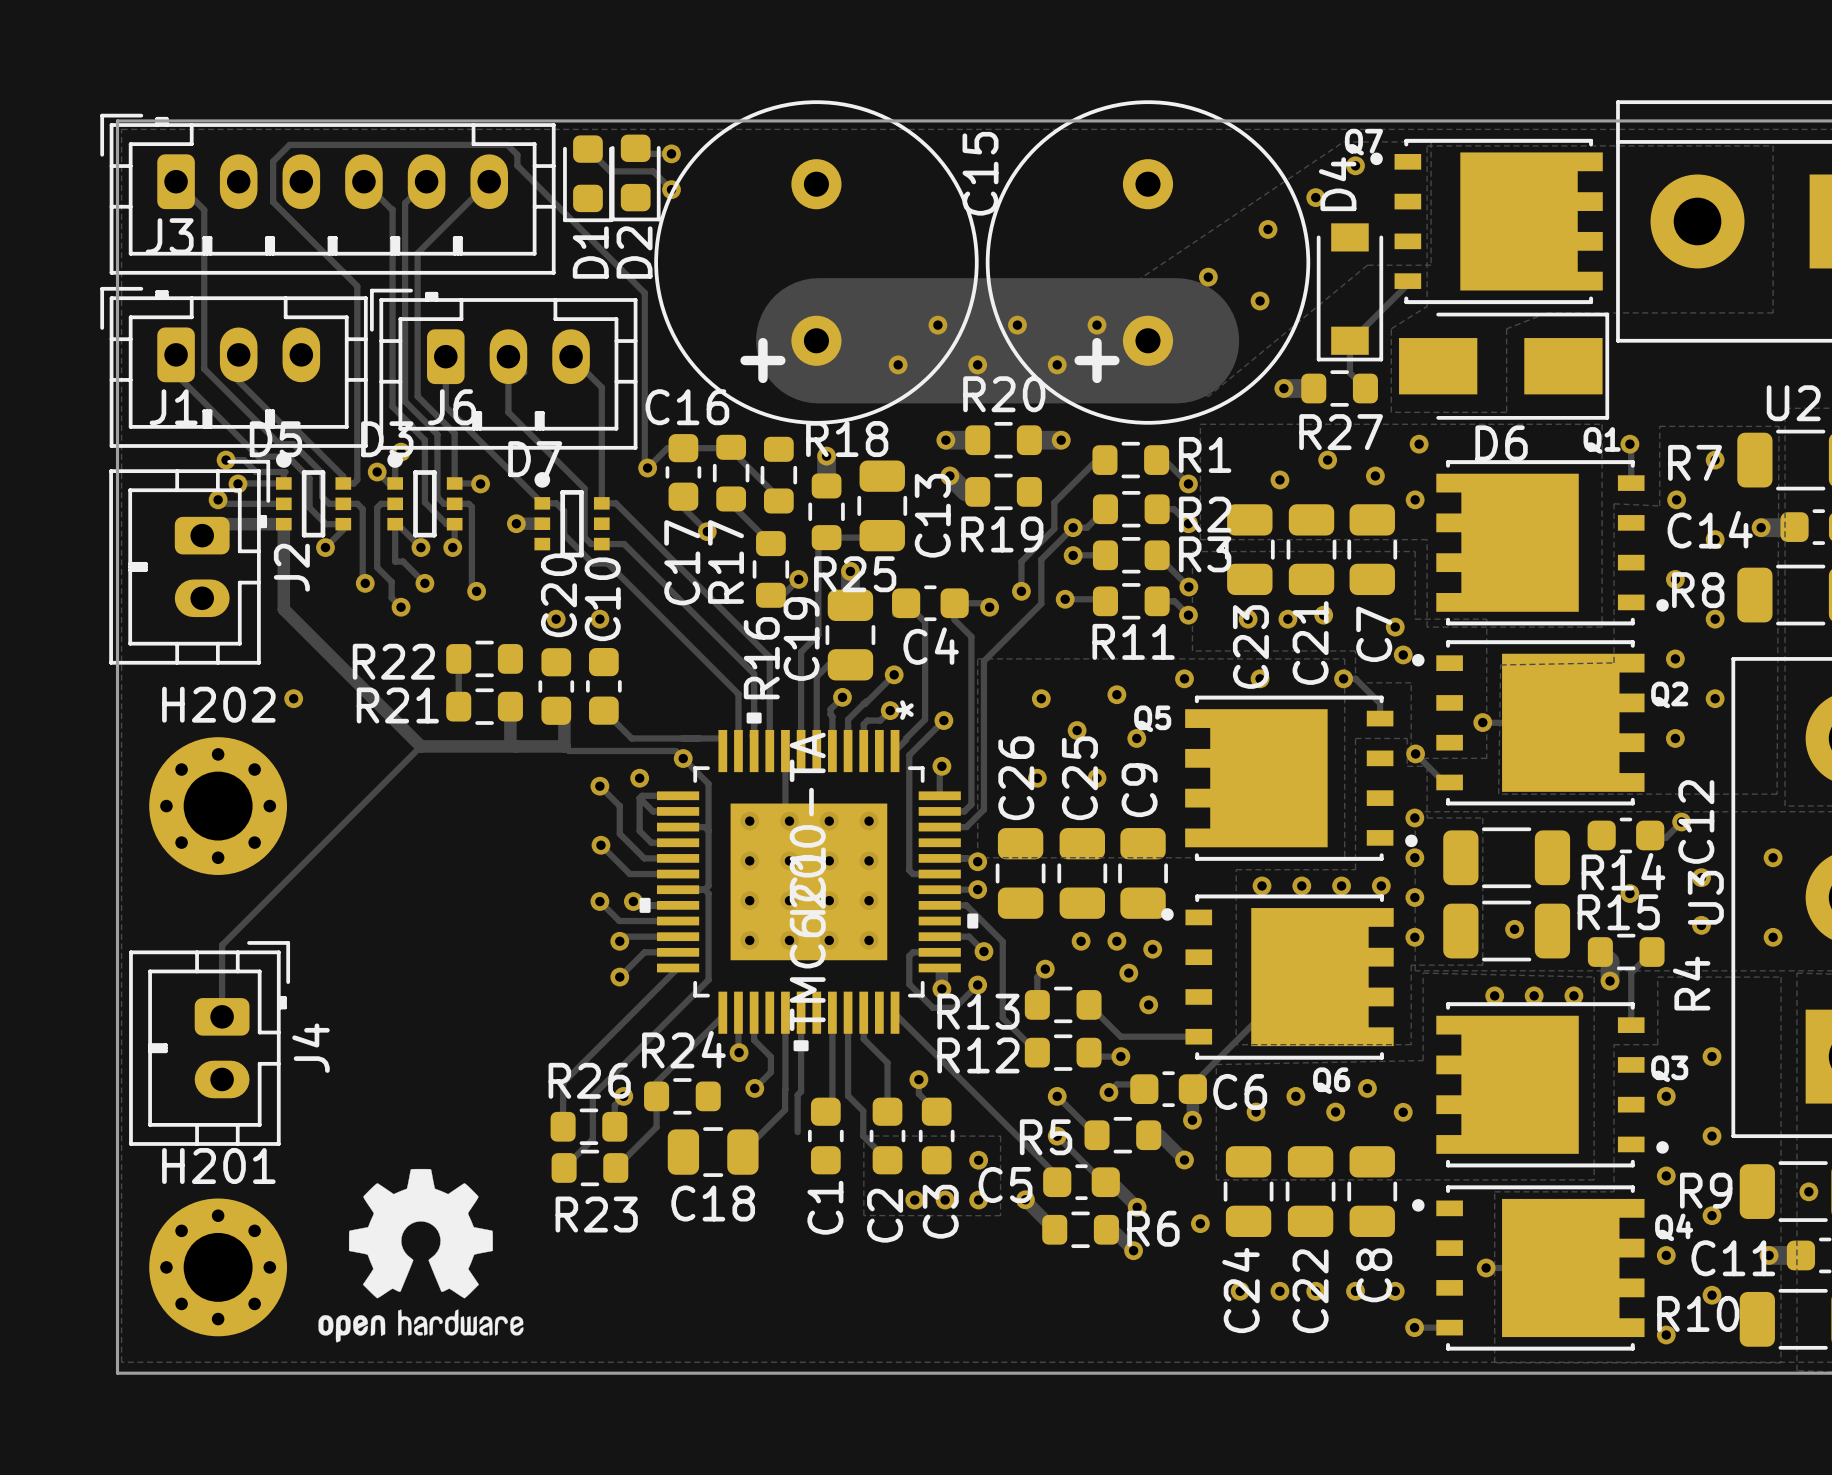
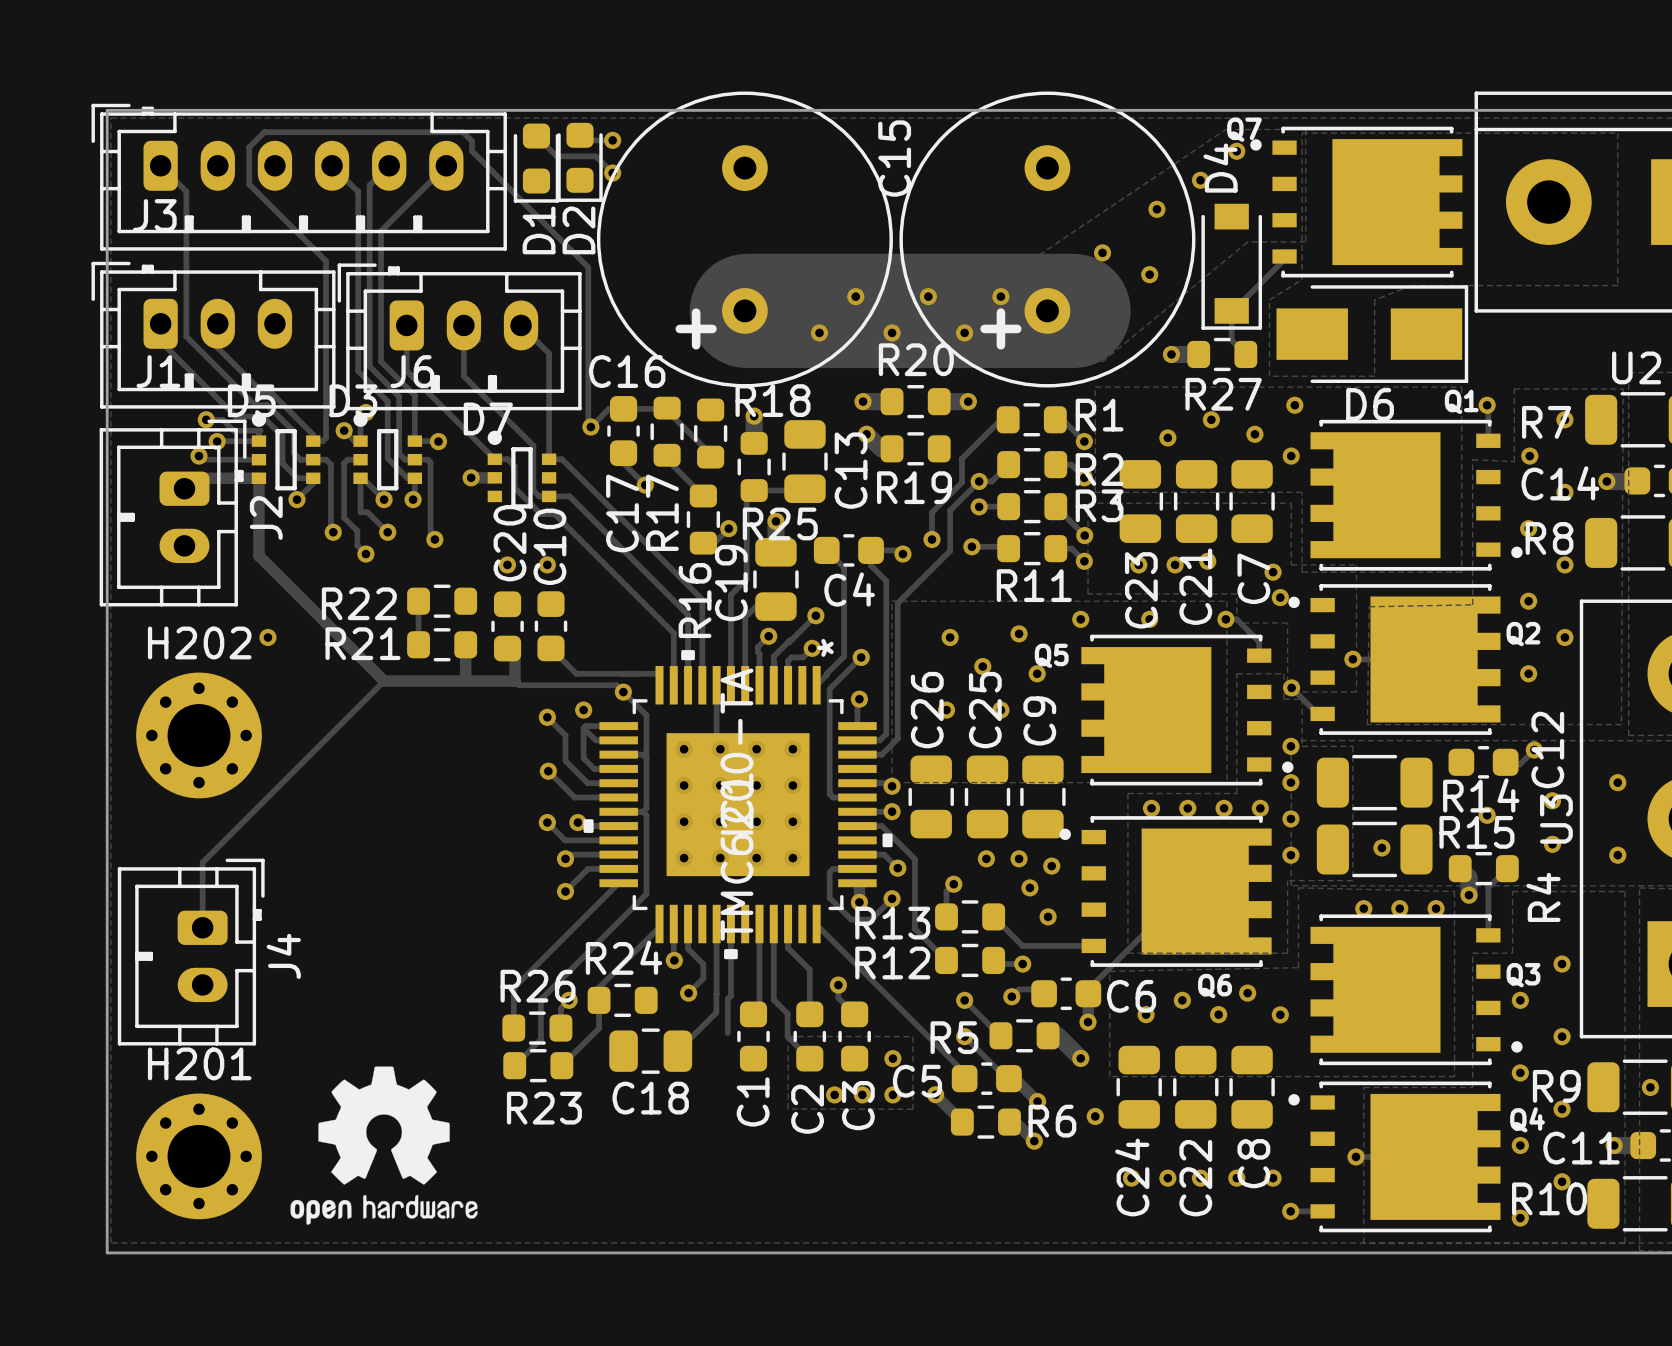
track width: thin (1159, 1135) (1184, 1160) -> thick (1058, 1035) (1080, 1058)

